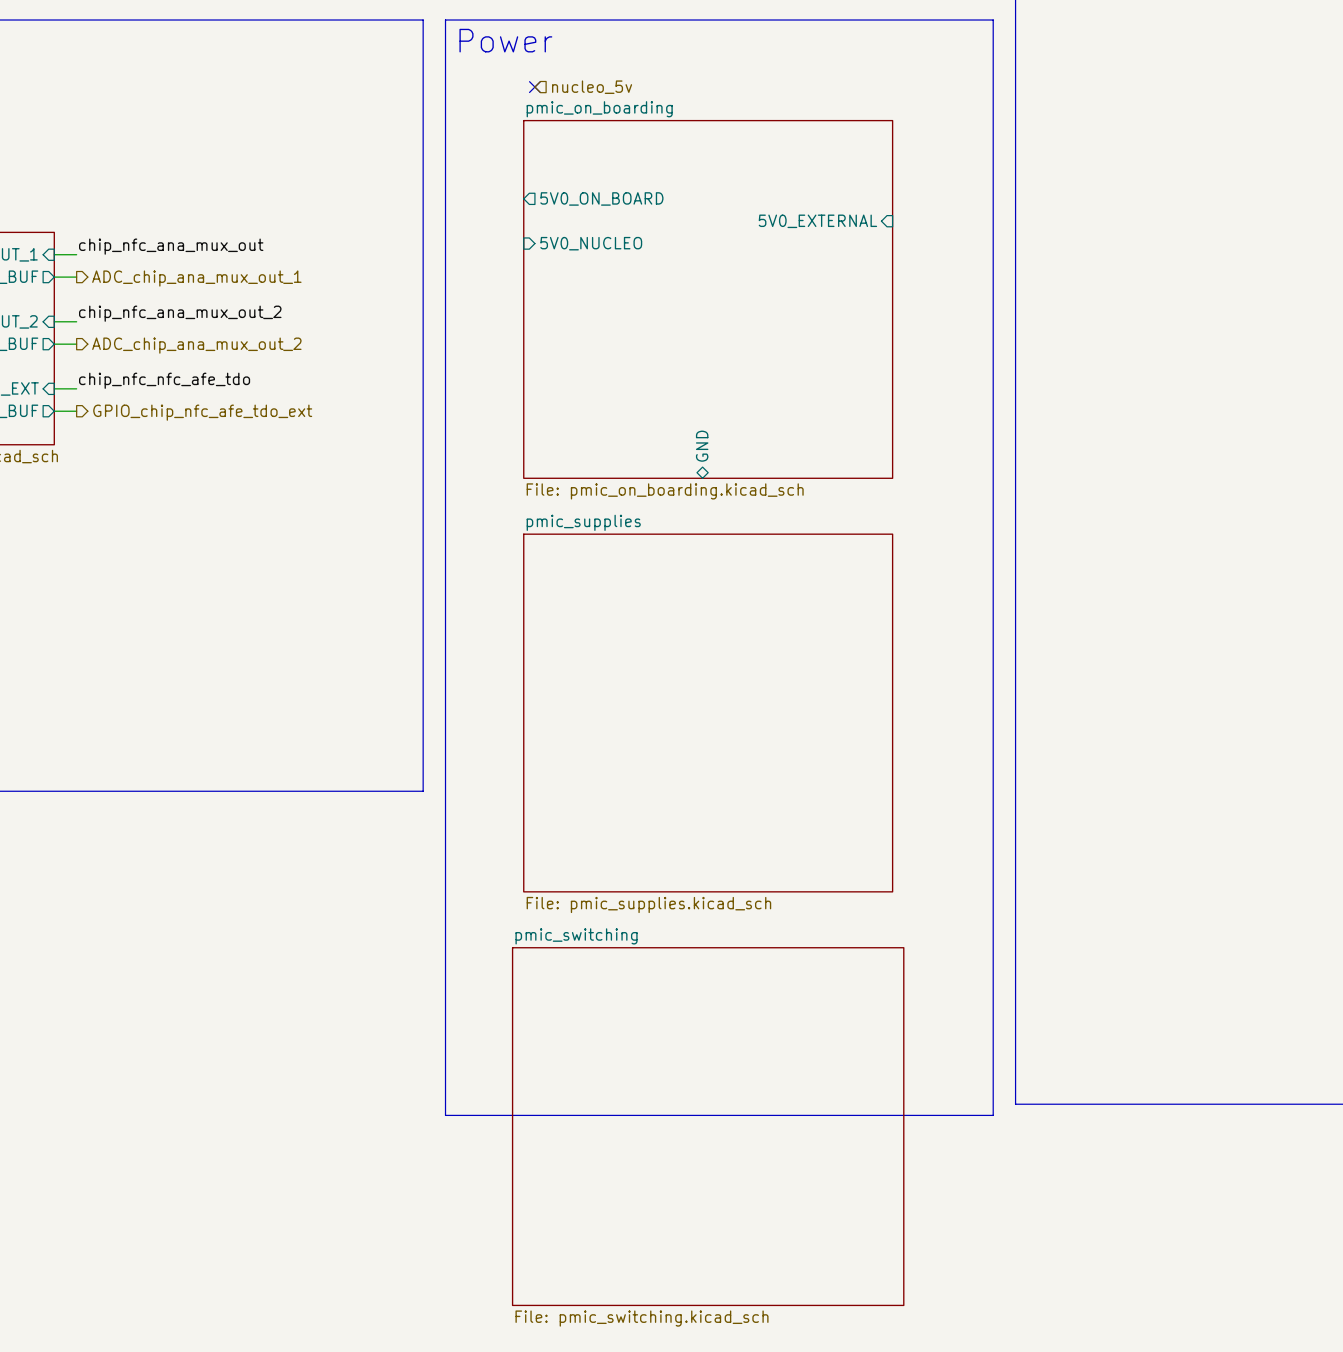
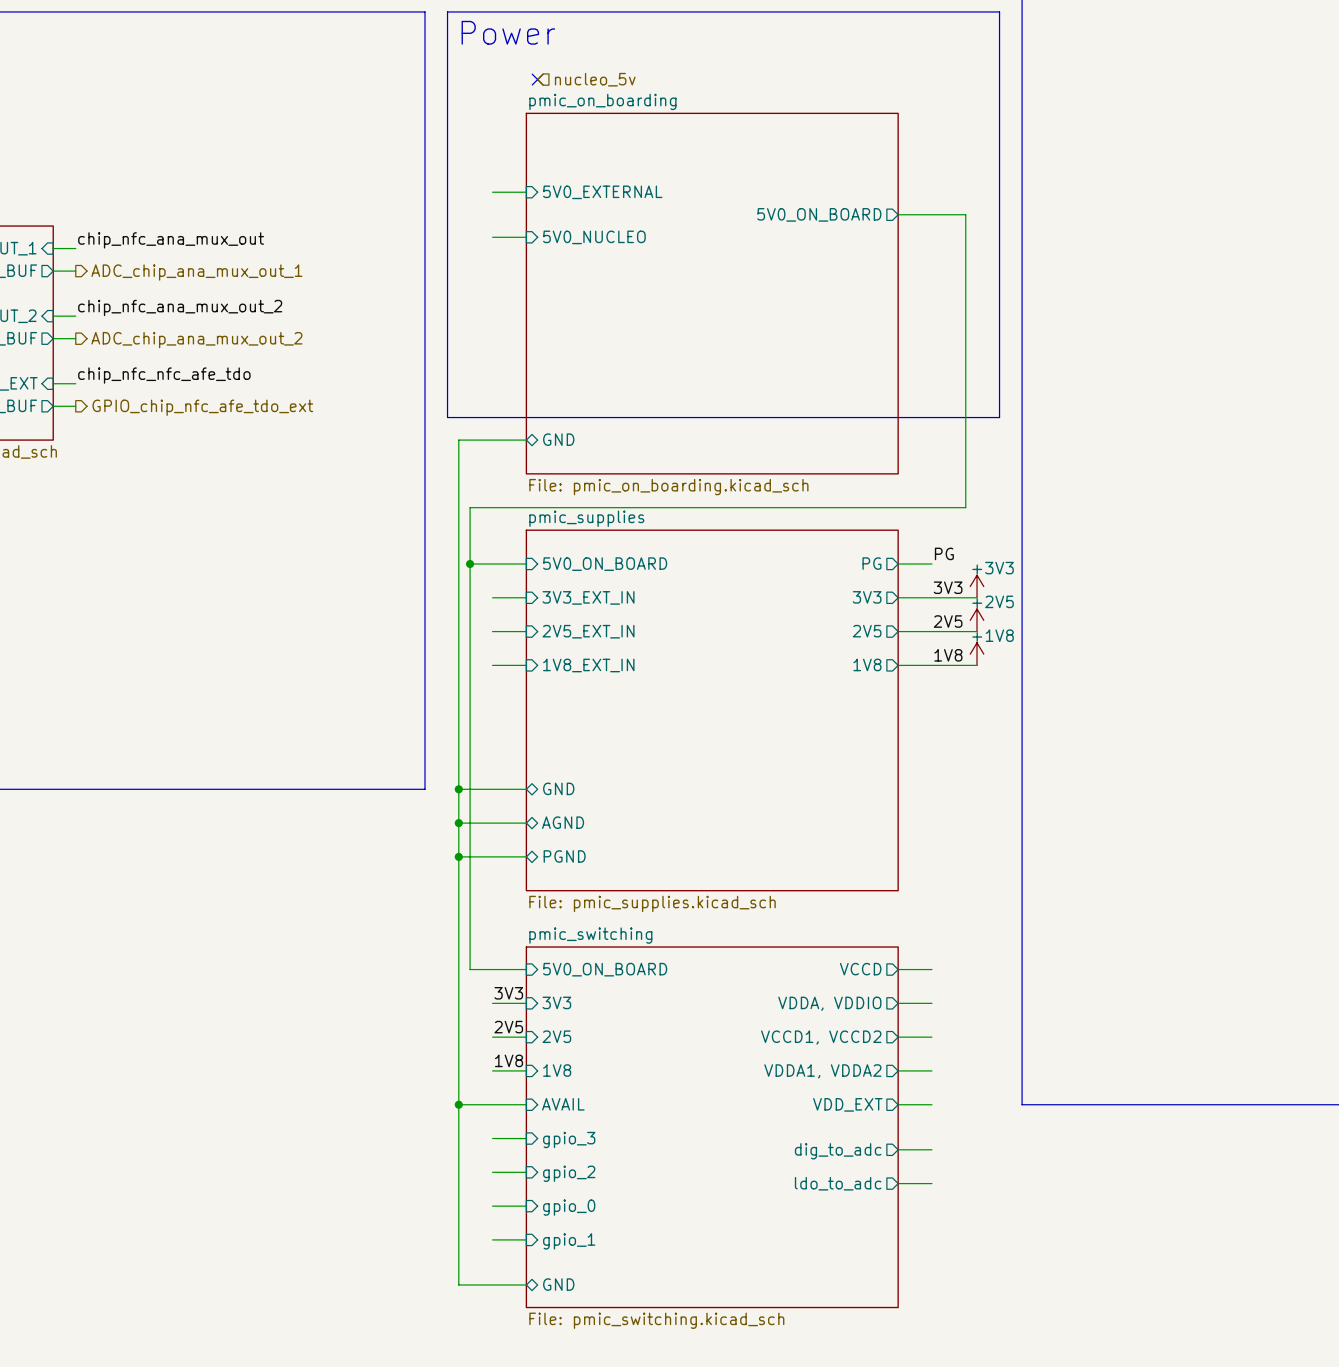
wire: none -> (492, 192) (526, 192)
sheet pin shape: output (601, 198) -> input (602, 192)
sheet pin: 5V0_ON_BOARD (601, 198) -> 5V0_EXTERNAL (602, 192)
sheet pin shape: input (817, 221) -> output (819, 214)
sheet pin: 5V0_EXTERNAL (817, 221) -> 5V0_ON_BOARD (819, 214)
wire: none -> (898, 214) (965, 214) (965, 507) (470, 507) (470, 969) (526, 969)
wire: none -> (492, 237) (526, 237)
line: (445, 422) (445, 1115) (993, 1115) (993, 422) -> (447, 417) (999, 417)
wire: none -> (526, 440) (458, 440) (458, 1284) (526, 1284)
sheet pin rotation: 0° (702, 446) -> 90° clockwise (558, 439)
sheet pin position: GND (702, 446) -> GND (558, 439)
label: none -> PG (944, 553)
wire: none -> (470, 563) (526, 563)
junction: none -> (470, 563)
sheet pin: none -> 5V0_ON_BOARD (605, 564)
sheet pin: none -> PG (871, 563)
wire: none -> (898, 563) (931, 563)
power symbol: none -> +3V3 (977, 586)
label: none -> 3V3 (948, 587)
sheet pin: none -> 3V3 (867, 597)
wire: none -> (492, 597) (526, 597)
sheet pin: none -> 3V3_EXT_IN (588, 597)
wire: none -> (898, 597) (977, 597)
power symbol: none -> +2V5 (977, 620)
label: none -> 2V5 (948, 621)
wire: none -> (492, 631) (526, 631)
sheet pin: none -> 2V5_EXT_IN (588, 631)
sheet pin: none -> 2V5 (867, 631)
wire: none -> (898, 631) (977, 631)
power symbol: none -> +1V8 (977, 654)
label: none -> 1V8 (948, 655)
sheet pin: none -> 1V8 (867, 664)
wire: none -> (492, 665) (526, 665)
sheet pin: none -> 1V8_EXT_IN (588, 665)
wire: none -> (898, 665) (977, 665)
sheet pin: none -> GND (558, 788)
wire: none -> (458, 789) (526, 789)
junction: none -> (458, 789)
wire: none -> (458, 823) (526, 823)
junction: none -> (458, 823)
sheet pin: none -> AGND (563, 822)
sheet pin: none -> PGND (564, 856)
wire: none -> (458, 856) (526, 856)
junction: none -> (458, 856)
sheet pmic_switching shape: [511, 947, 905, 1307] -> [525, 946, 899, 1309]
sheet pin: none -> VCCD (860, 969)
sheet pin: none -> 5V0_ON_BOARD (605, 969)
wire: none -> (898, 969) (931, 969)
label: none -> 3V3 (508, 993)
wire: none -> (492, 1003) (526, 1003)
sheet pin: none -> 3V3 (556, 1002)
wire: none -> (898, 1003) (931, 1003)
sheet pin: none -> VDDA, VDDIO (829, 1003)
label: none -> 2V5 (508, 1027)
sheet pin: none -> 2V5 (556, 1036)
wire: none -> (492, 1037) (526, 1037)
sheet pin: none -> VCCD1, VCCD2 (821, 1037)
wire: none -> (898, 1037) (931, 1037)
label: none -> 1V8 (509, 1060)
wire: none -> (492, 1070) (526, 1070)
sheet pin: none -> 1V8 (557, 1070)
wire: none -> (898, 1070) (931, 1070)
sheet pin: none -> VDDA1, VDDA2 (822, 1071)
sheet pin: none -> AVAIL (563, 1104)
wire: none -> (458, 1104) (526, 1104)
junction: none -> (458, 1104)
sheet pin: none -> VDD_EXT (847, 1104)
wire: none -> (898, 1104) (931, 1104)
wire: none -> (492, 1138) (526, 1138)
sheet pin: none -> gpio_3 (569, 1139)
wire: none -> (898, 1149) (931, 1149)
sheet pin: none -> dig_to_adc (838, 1151)
wire: none -> (492, 1172) (526, 1172)
sheet pin: none -> gpio_2 (569, 1173)
sheet pin: none -> ldo_to_adc (838, 1183)
wire: none -> (898, 1183) (931, 1183)
wire: none -> (492, 1206) (526, 1206)
sheet pin: none -> gpio_0 (569, 1207)
wire: none -> (492, 1239) (526, 1239)
sheet pin: none -> gpio_1 (569, 1241)
sheet pin: none -> GND (558, 1284)

